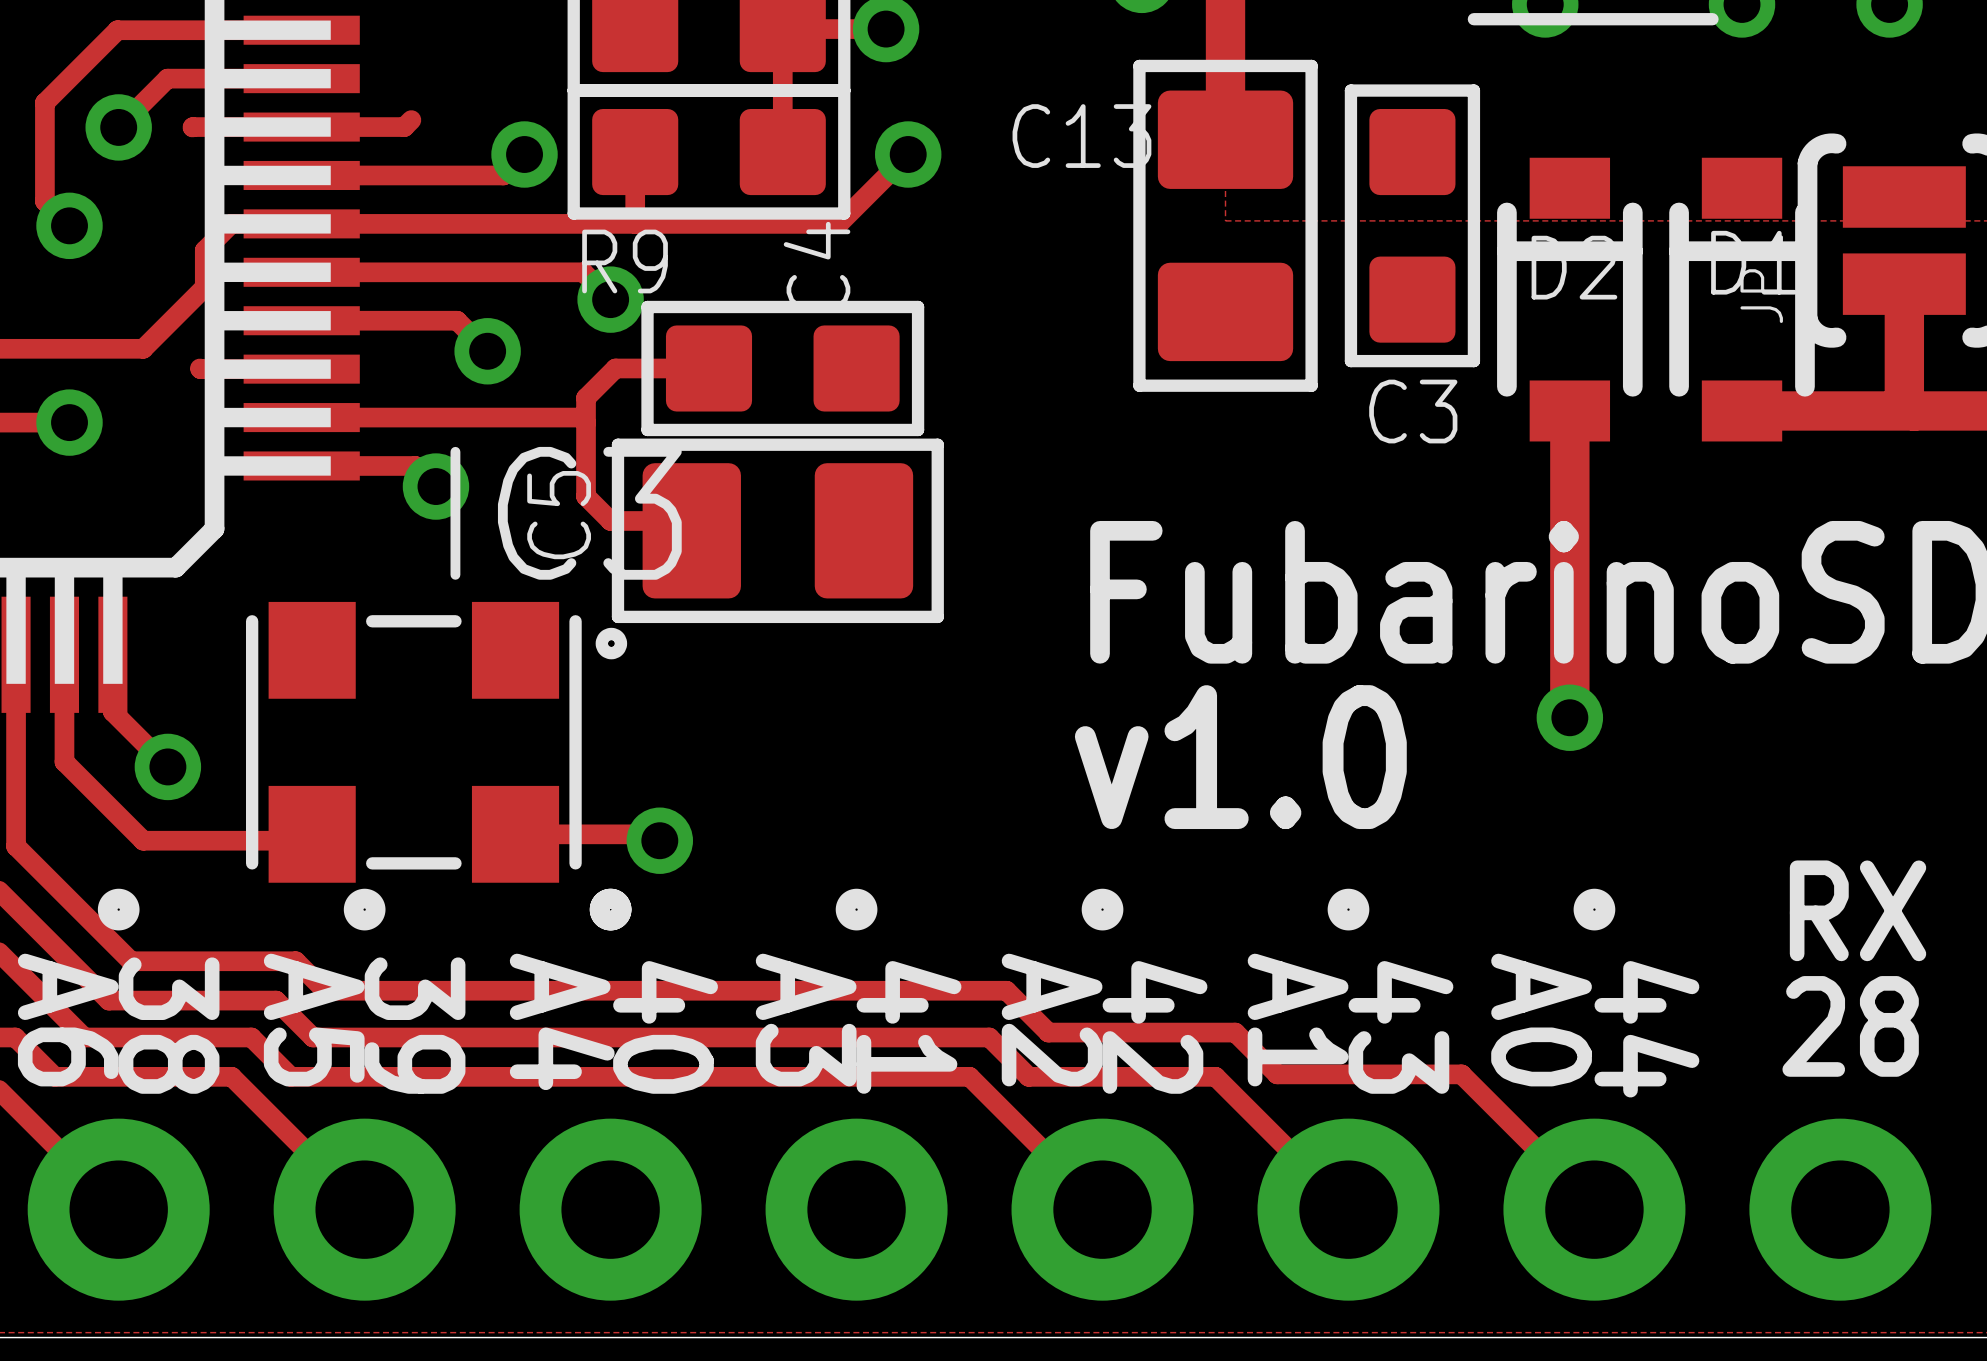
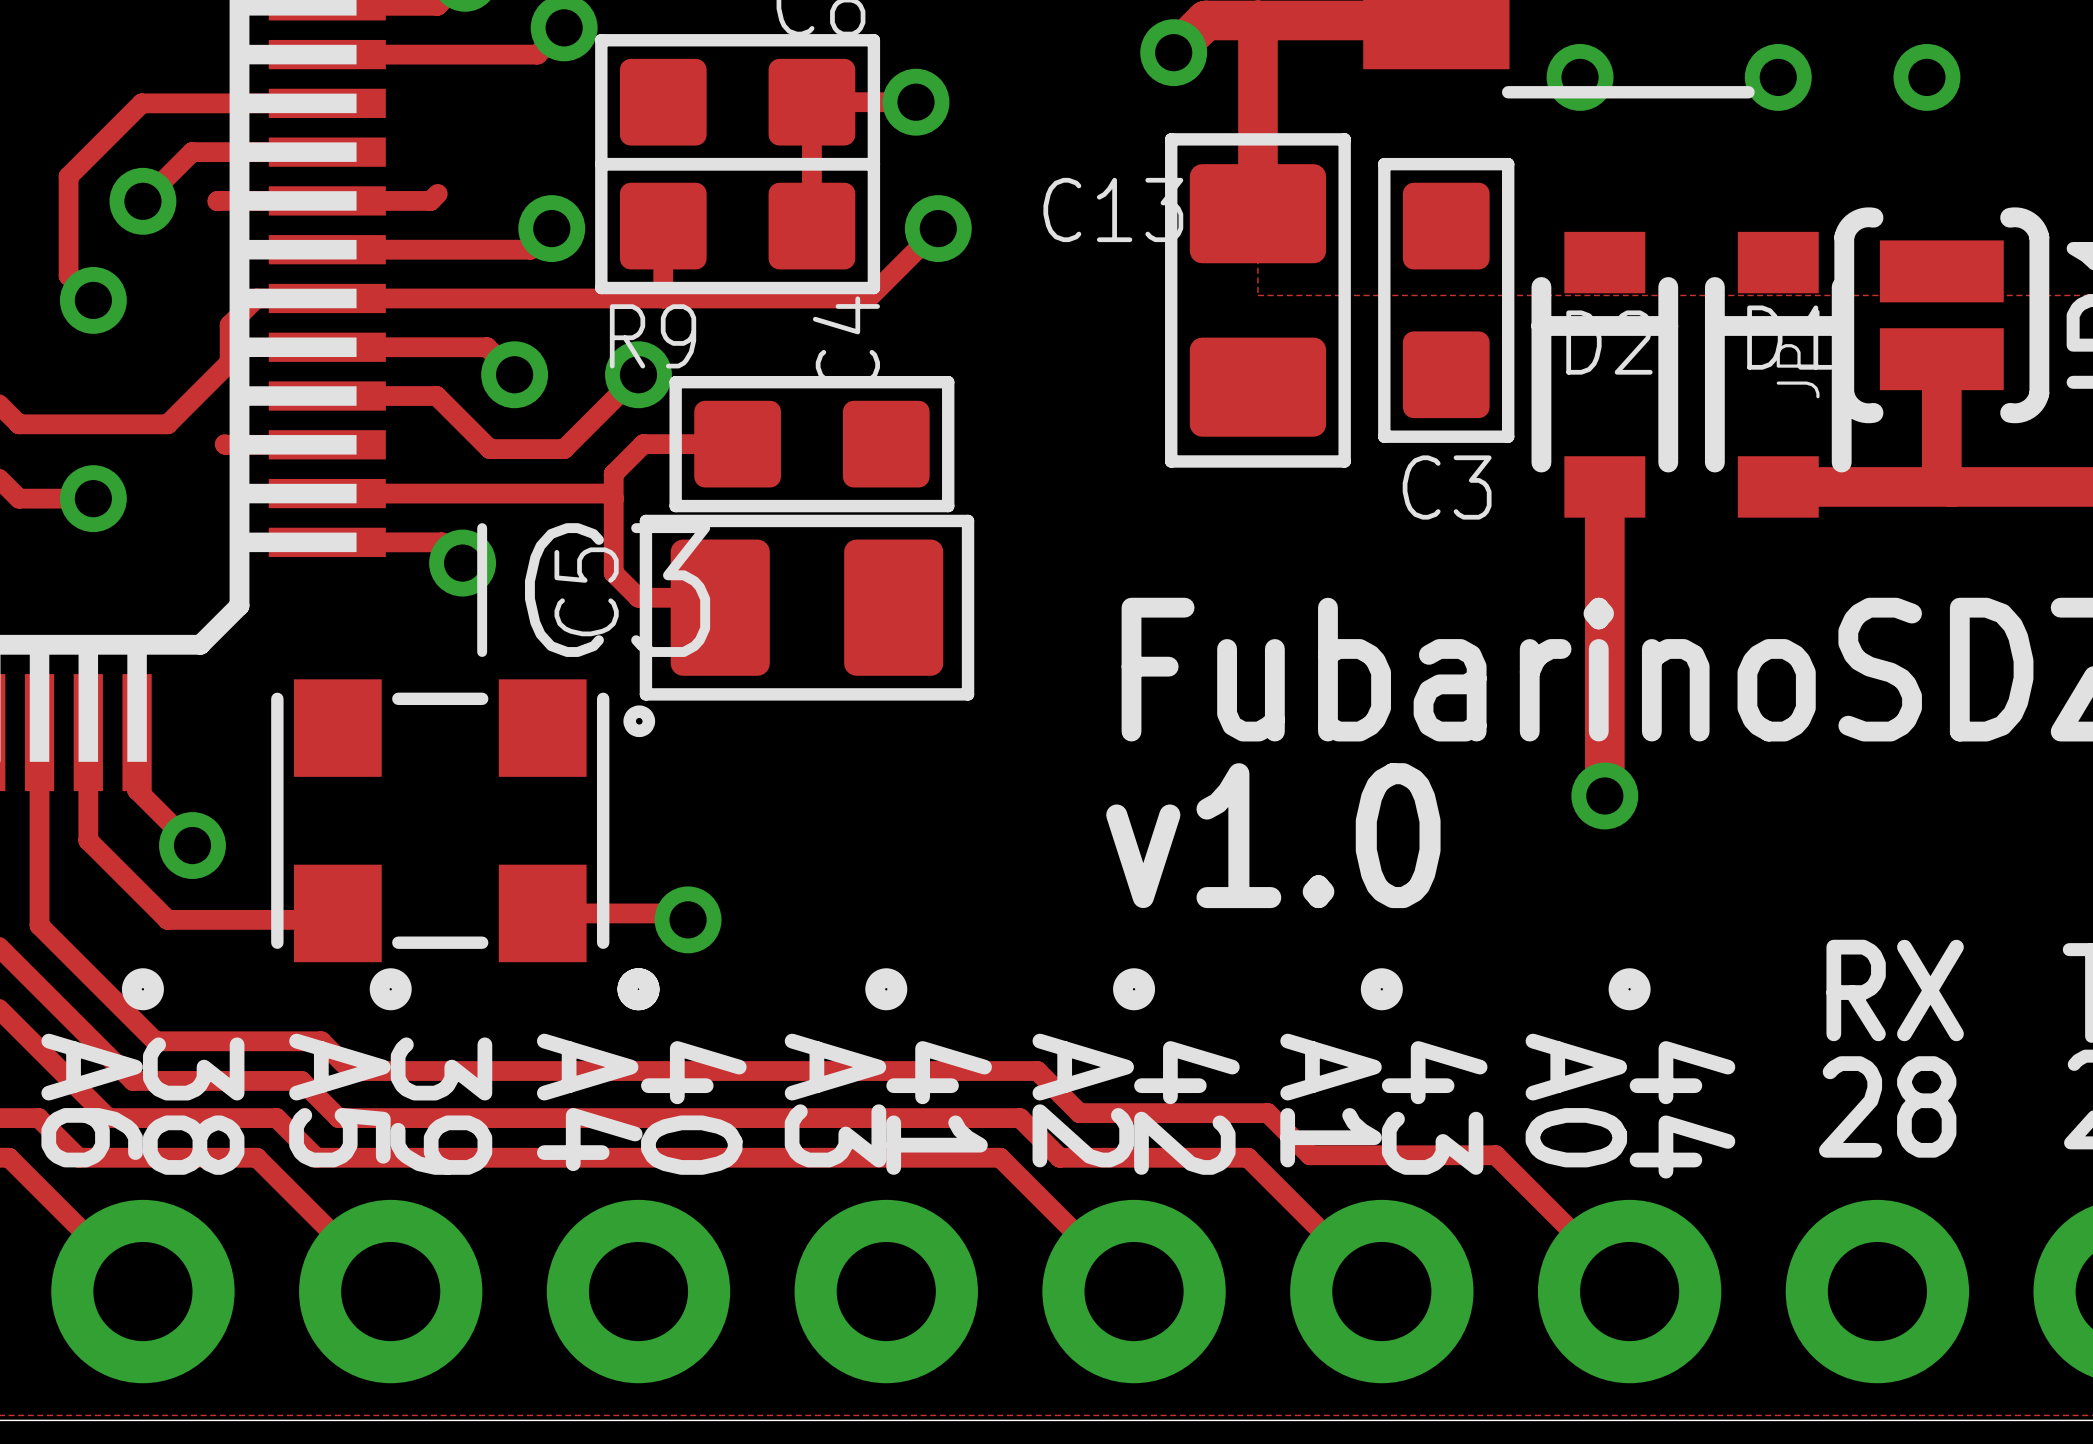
track: (460, 272) (583, 272) (610, 299) -> (436, 396) (489, 449) (564, 449) (638, 374)
track: (410, 320) (457, 320) (487, 351) -> none
via position: (487, 351) -> (514, 374)

